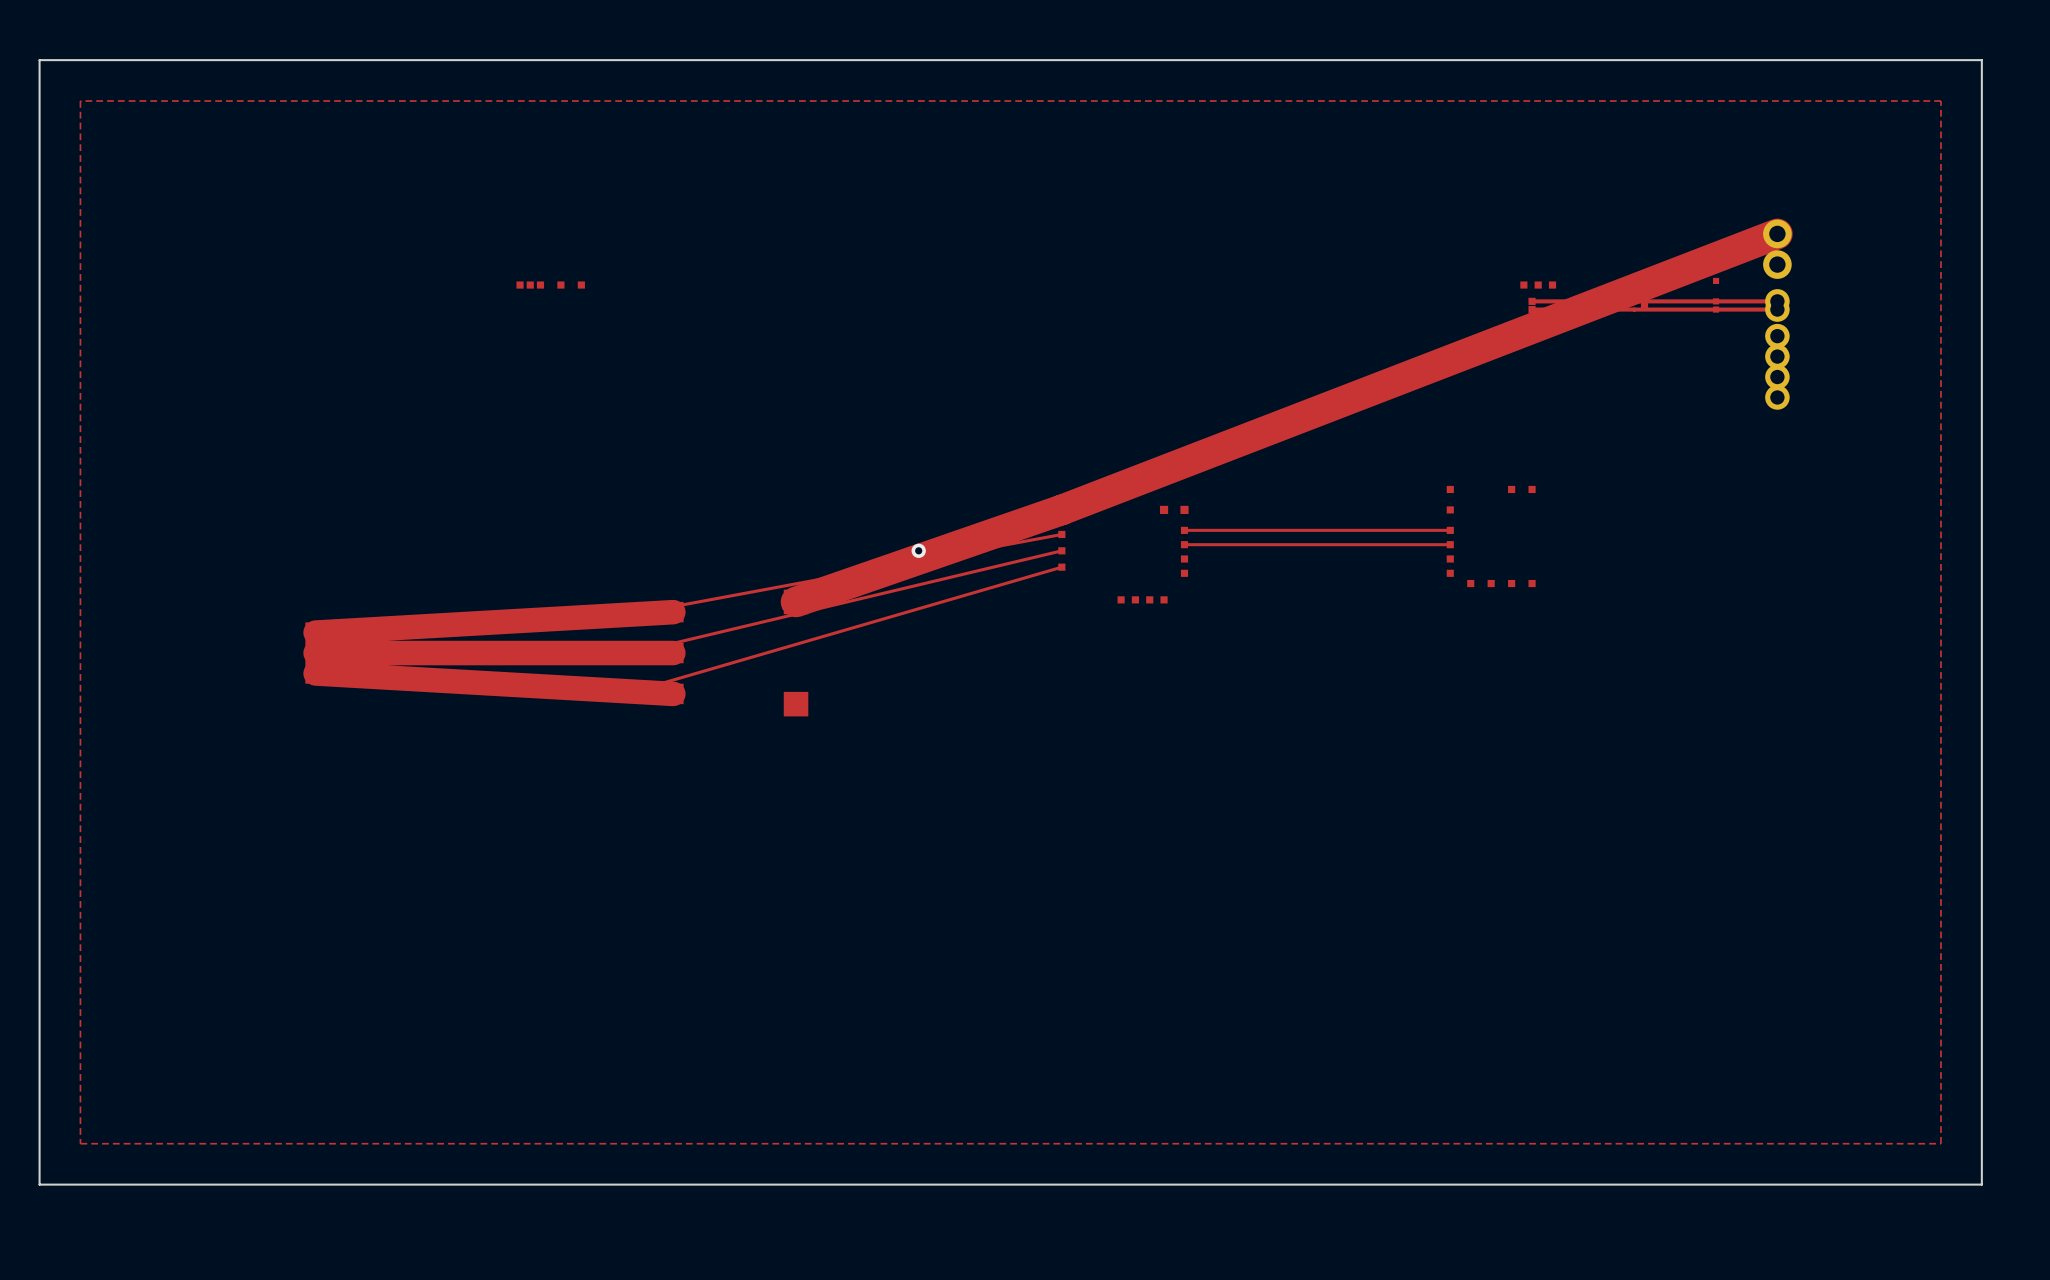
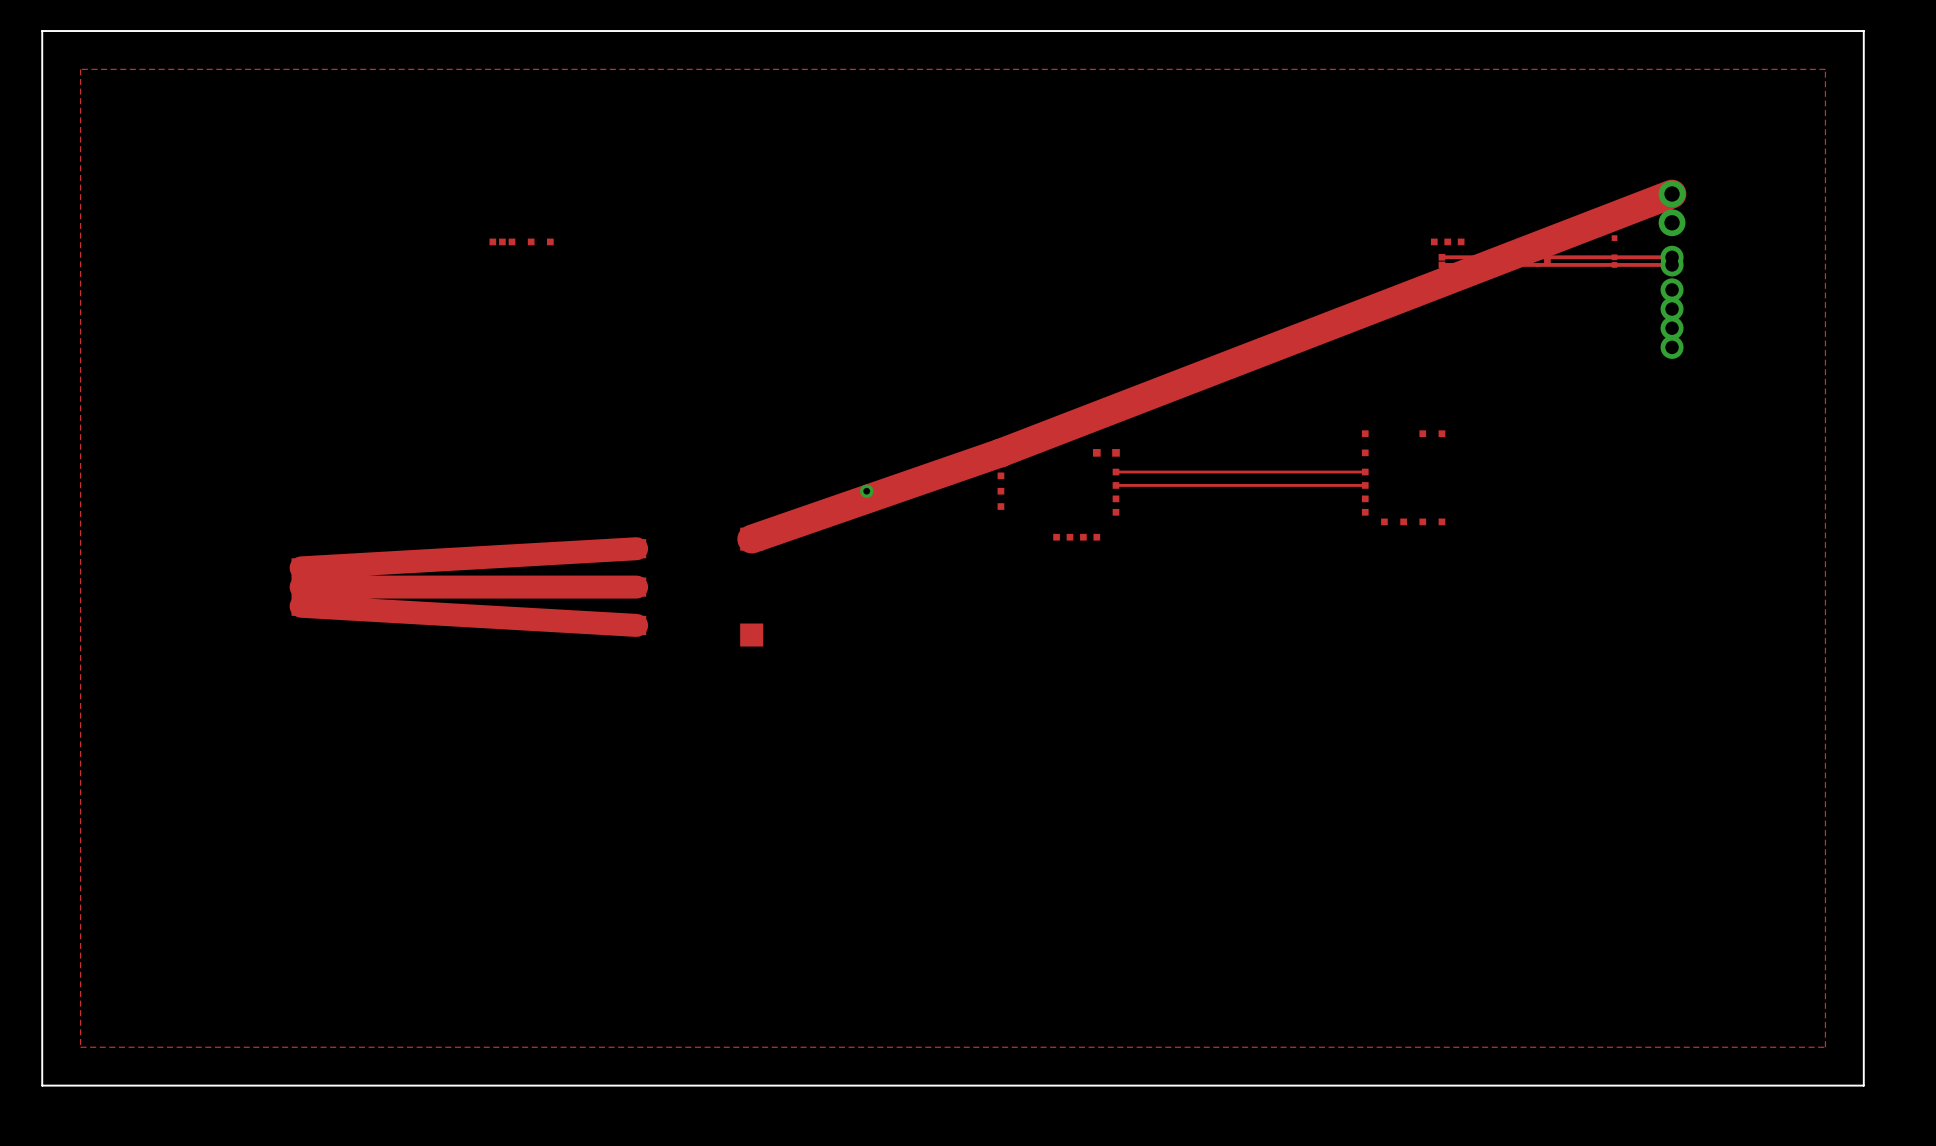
top track: (1061, 534) (632, 614) -> none
top track: (1061, 550) (632, 653) -> none
top track: (1061, 567) (632, 691) -> none

